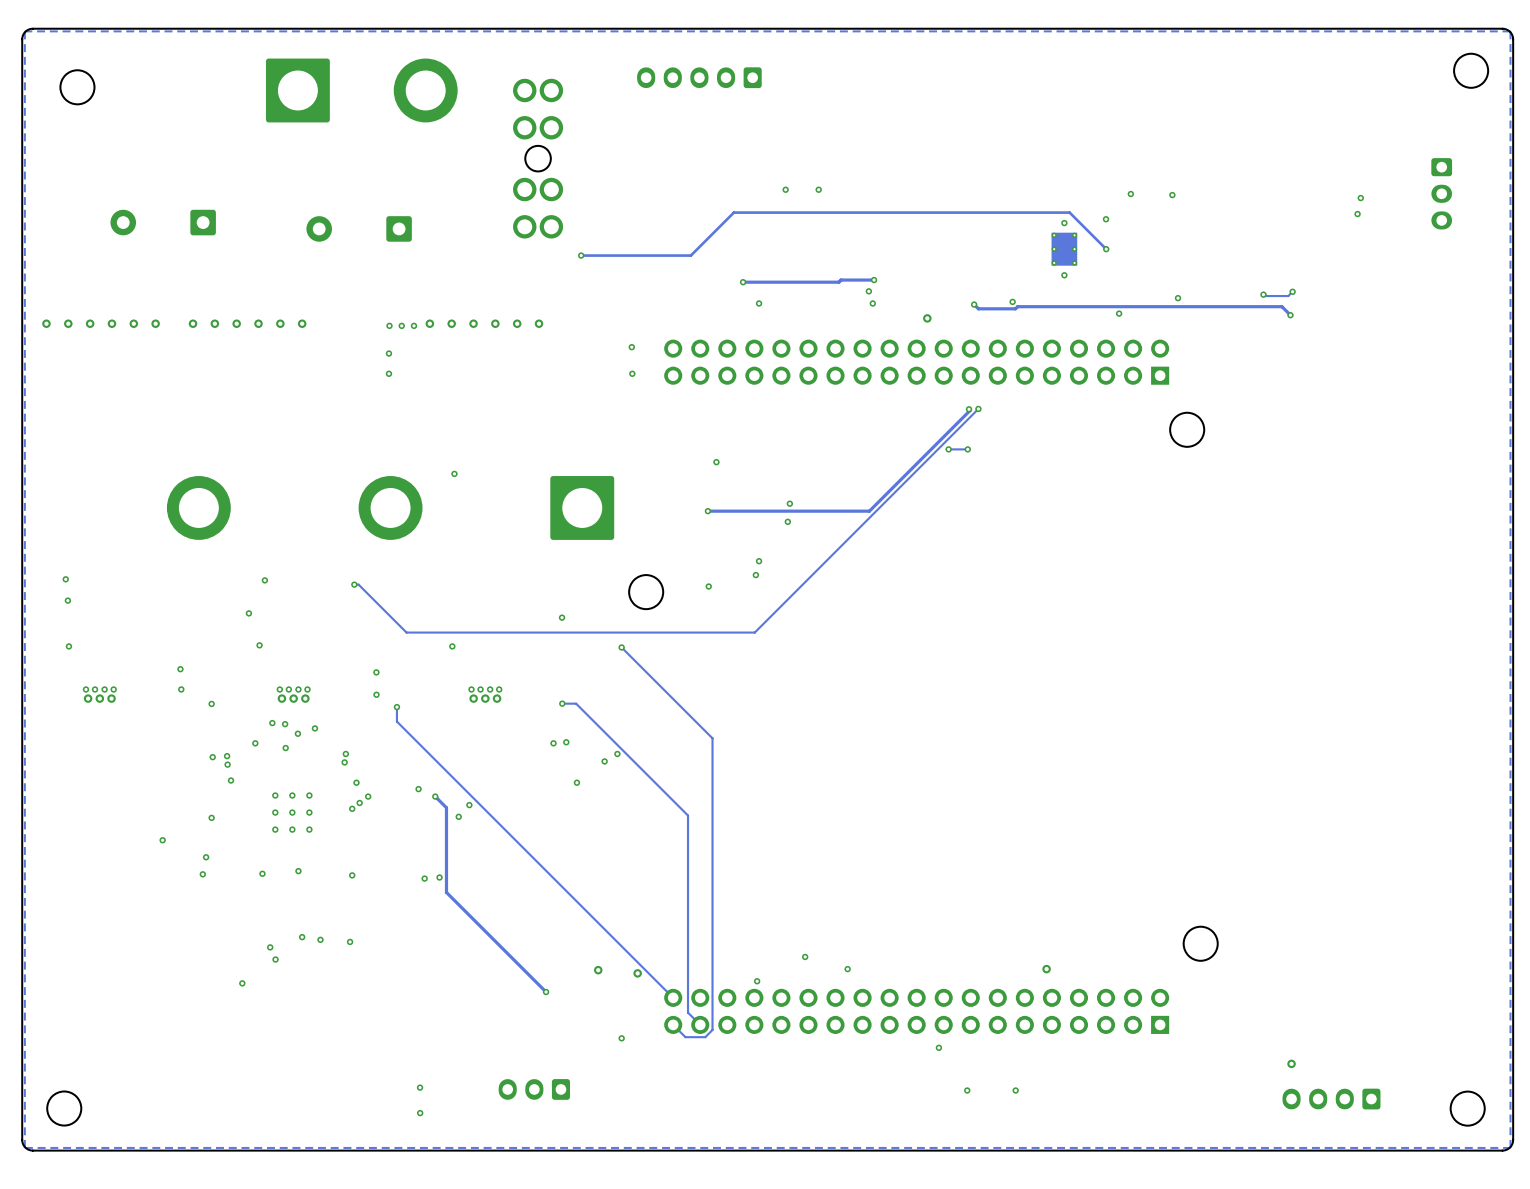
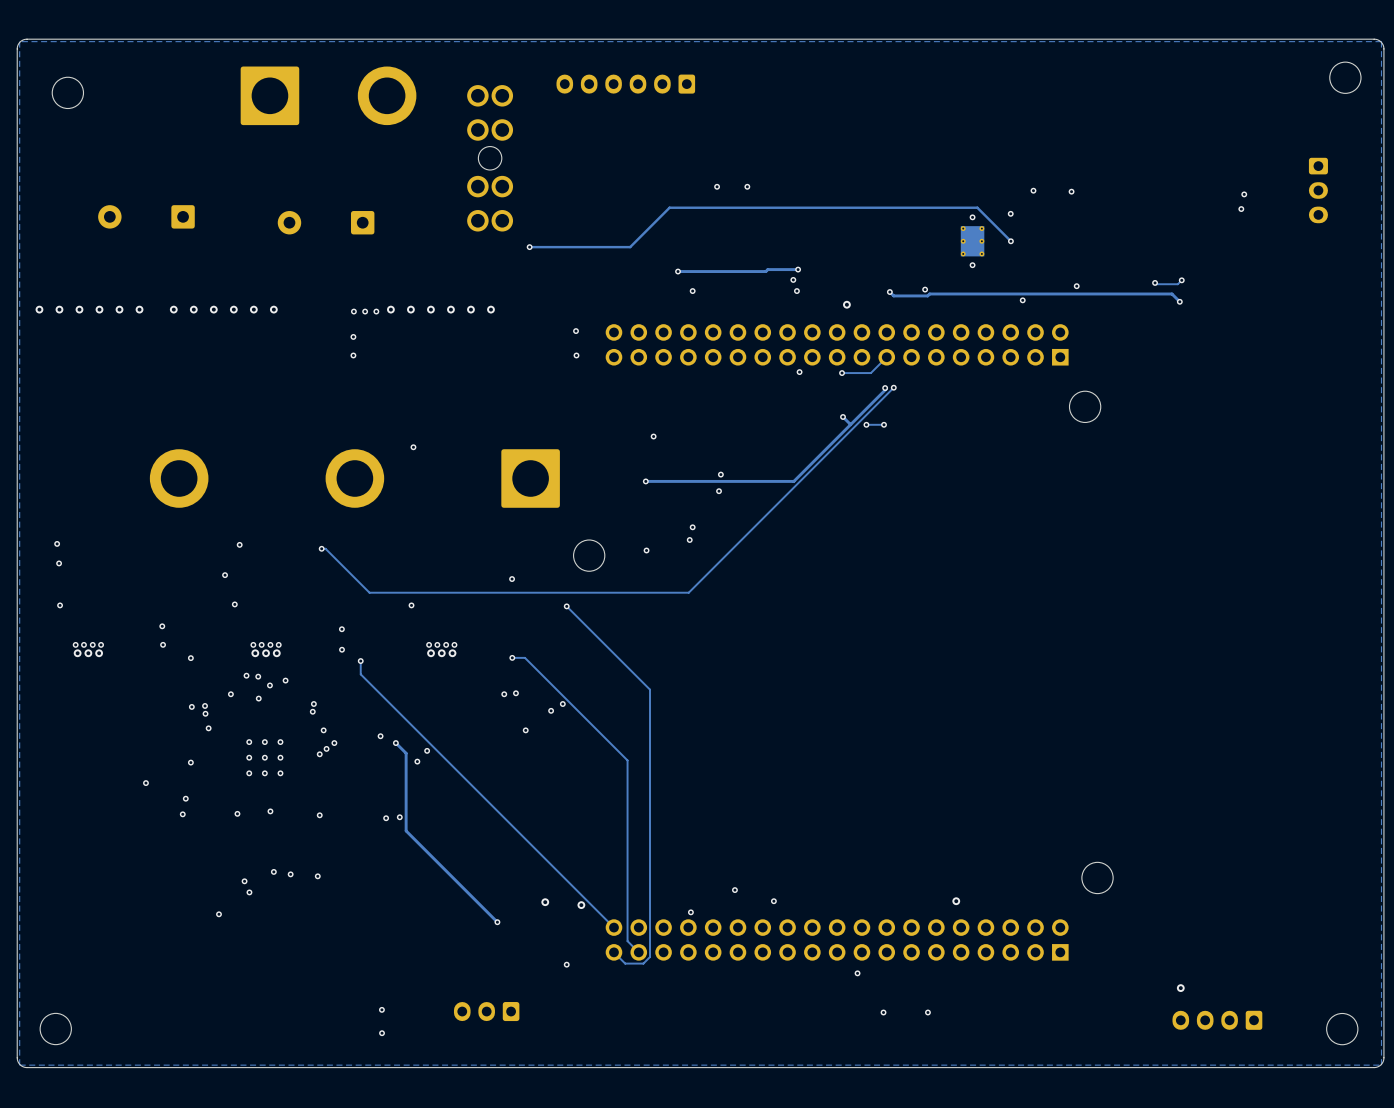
part: none -> (625, 84)
track: none -> (886, 357) (870, 373) (842, 373)
via: none -> (799, 372)
via: none -> (842, 373)
track: none -> (843, 416) (850, 424)
via: none -> (843, 416)

